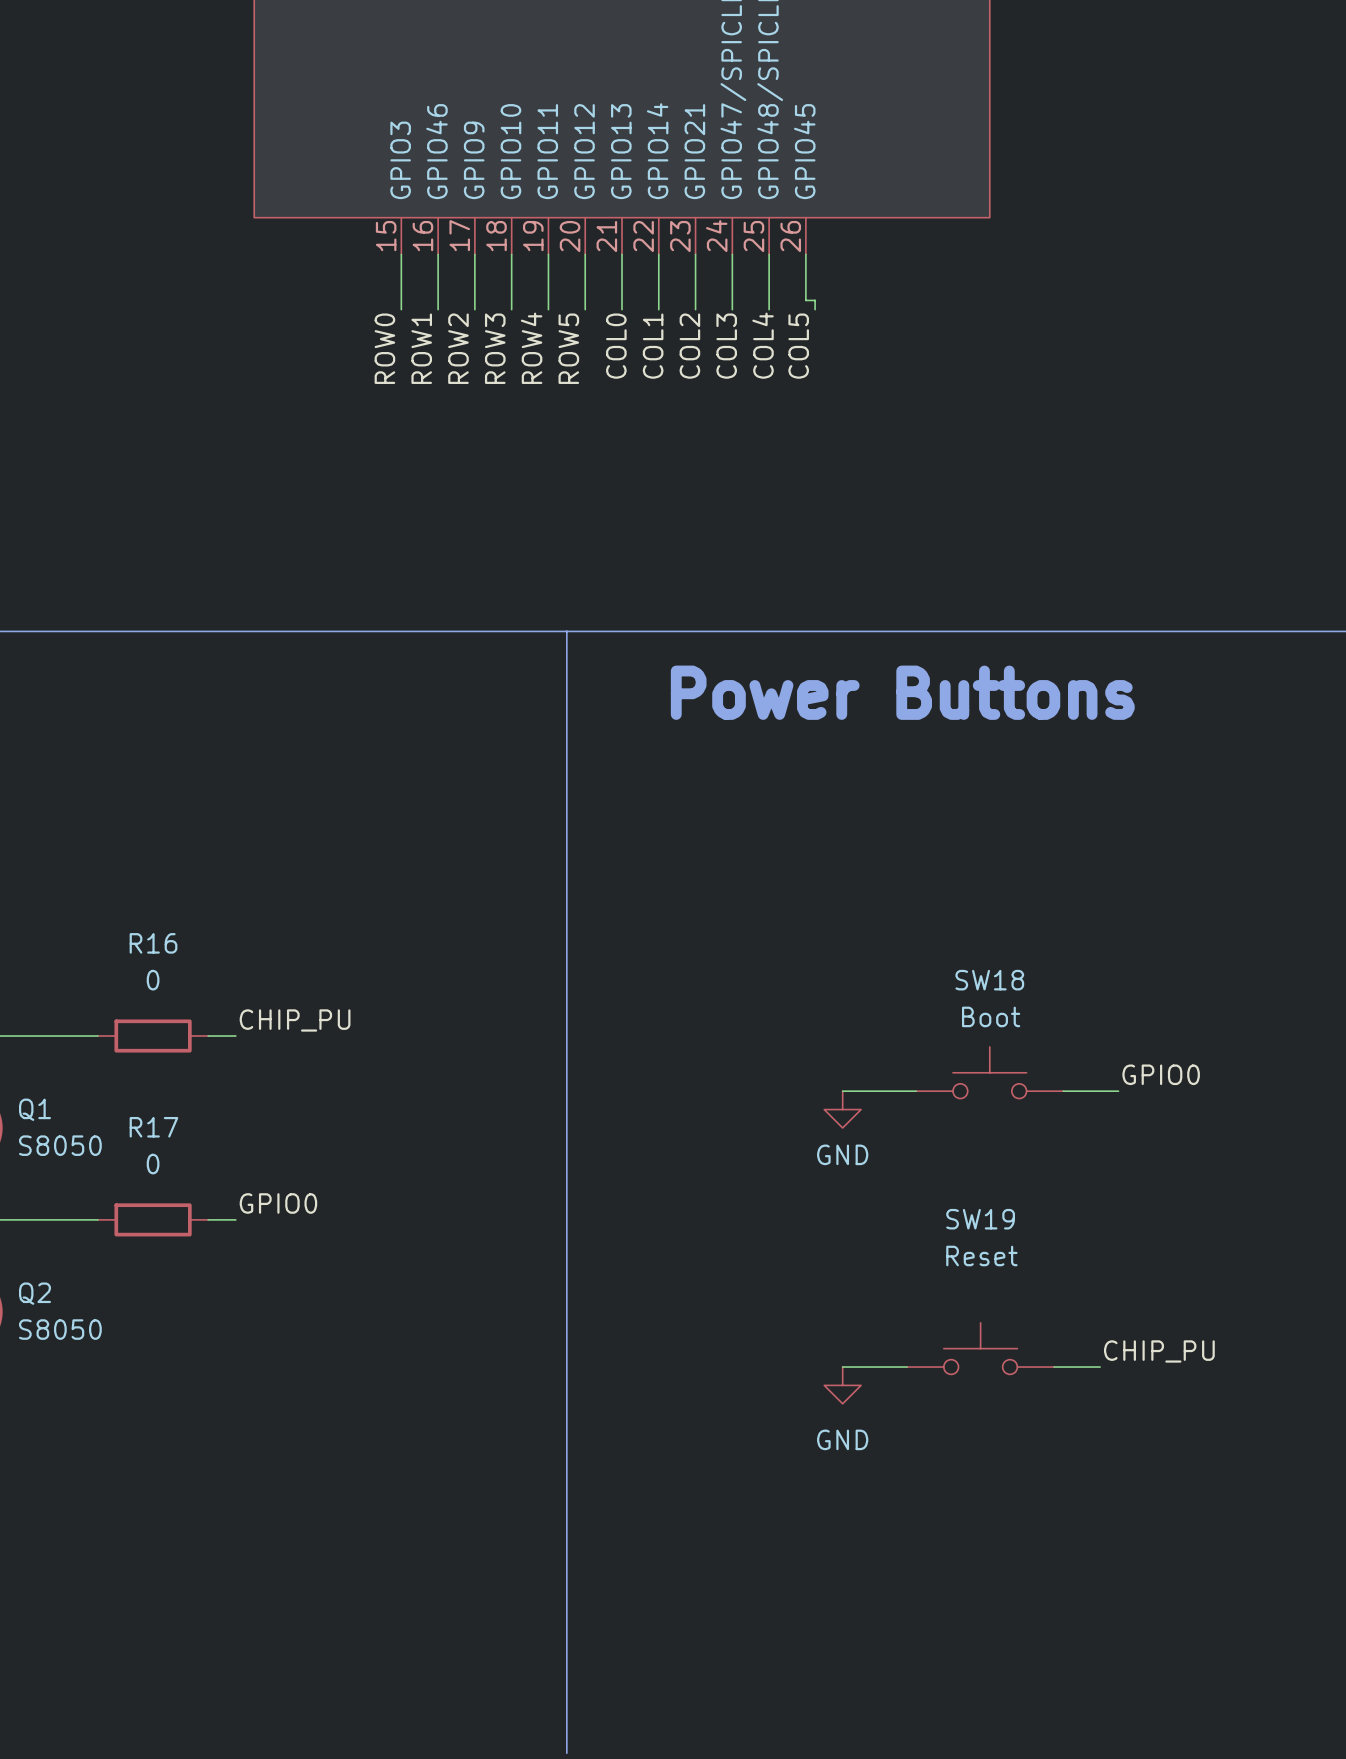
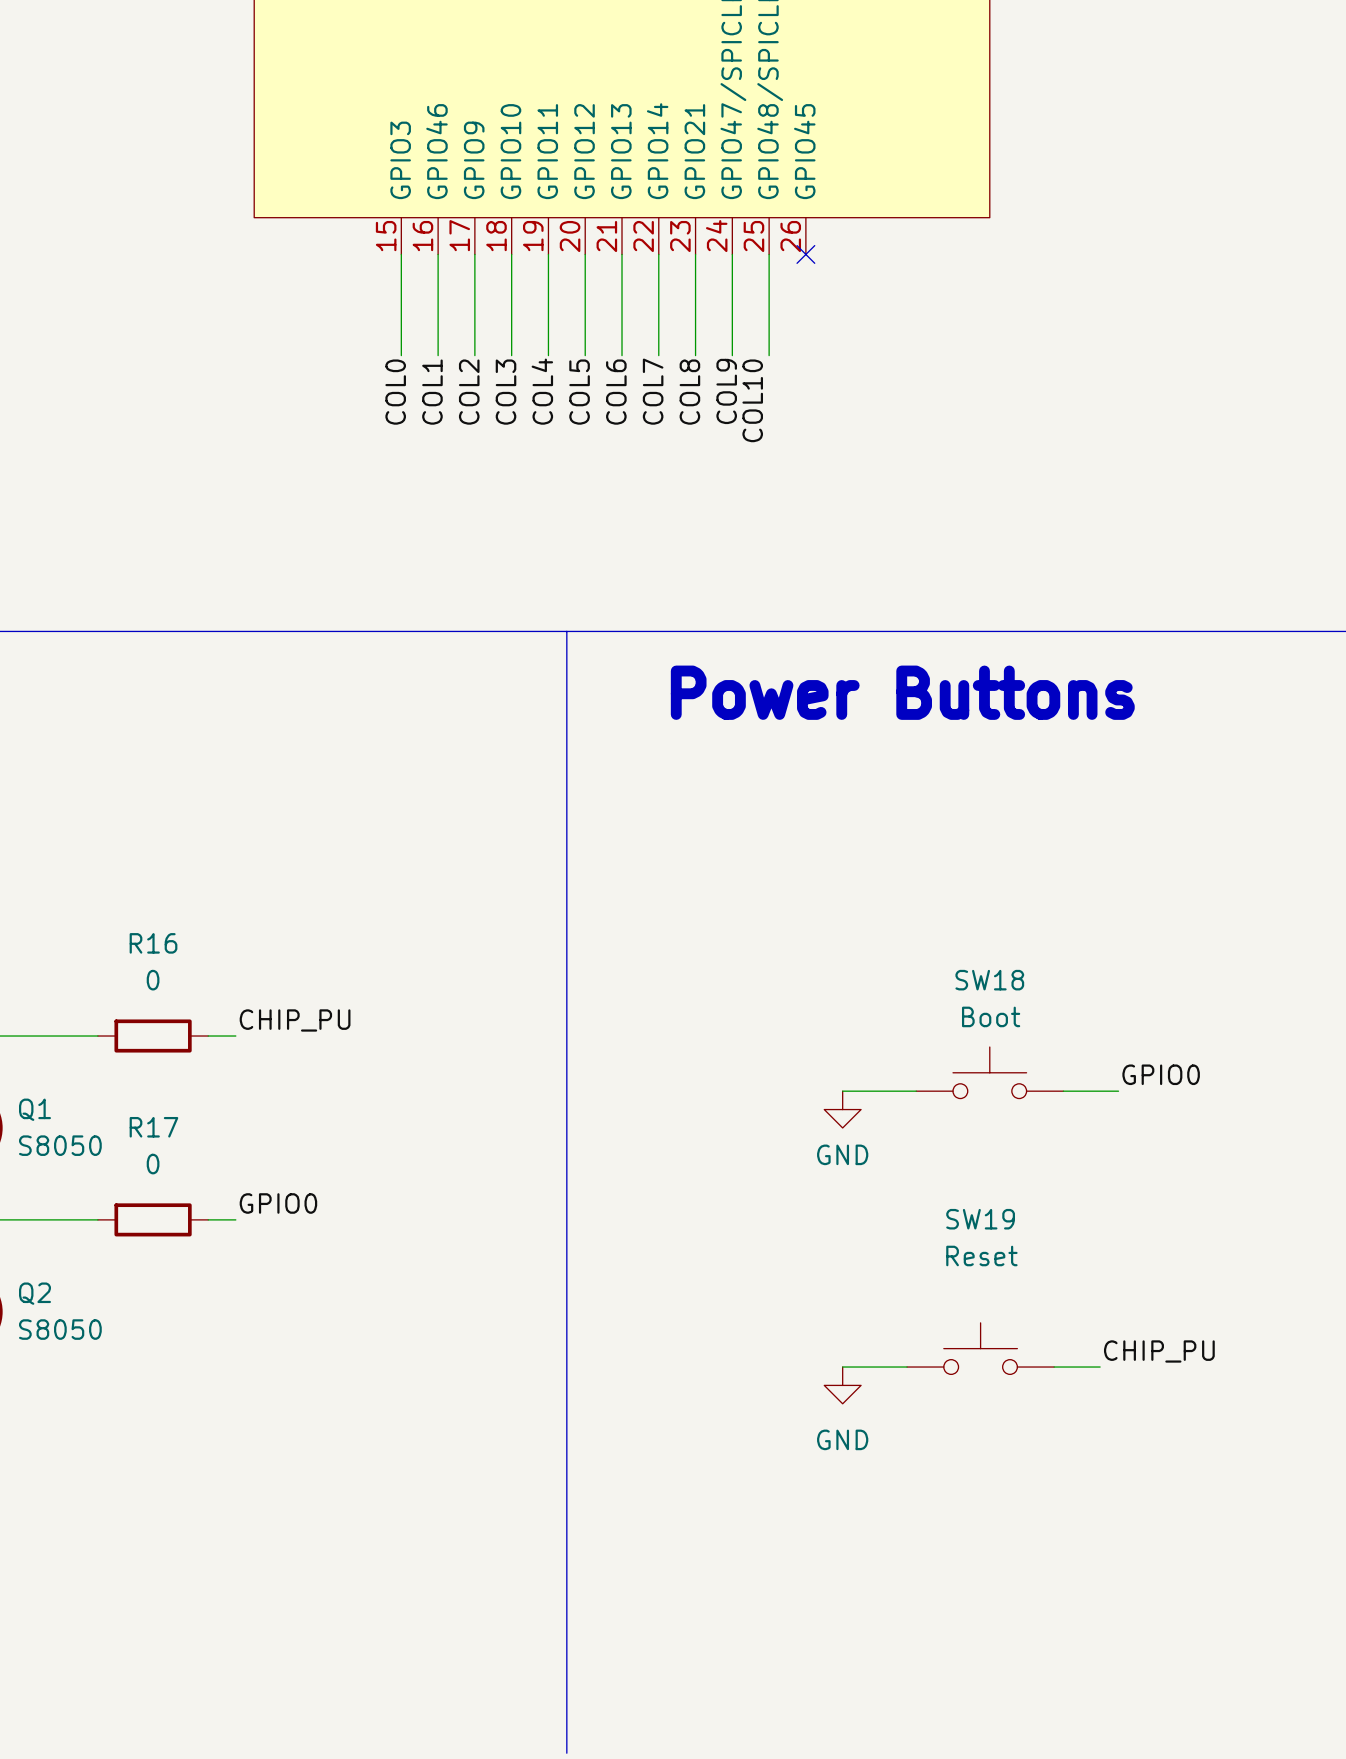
wire: (805, 254) (805, 300) (815, 300) (815, 309) -> none
no-connect mark: none -> (805, 254)
wire: none -> (401, 309) (401, 355)
wire: none -> (438, 309) (438, 355)
wire: none -> (474, 309) (474, 355)
wire: none -> (511, 309) (511, 355)
wire: none -> (548, 309) (548, 355)
wire: none -> (585, 309) (585, 355)
wire: none -> (622, 309) (622, 355)
wire: none -> (658, 309) (658, 355)
wire: none -> (695, 309) (695, 355)
wire: none -> (732, 309) (732, 355)
wire: none -> (769, 309) (769, 355)
label position: COL4 (763, 345) -> COL4 (542, 391)
label position: COL0 (616, 346) -> COL0 (395, 392)
label position: COL1 (653, 346) -> COL1 (432, 392)
label position: COL2 (689, 346) -> COL2 (469, 392)
label position: COL3 (726, 346) -> COL3 (506, 392)
label position: COL5 (798, 346) -> COL5 (579, 392)
label: ROW0 (384, 348) -> none
label: ROW1 (421, 348) -> none
label: ROW2 (458, 348) -> none
label: ROW3 (495, 348) -> none
label: ROW4 (531, 348) -> none
label: ROW5 (568, 348) -> none
label: none -> COL7 (653, 391)
label: none -> COL9 (726, 391)
label: none -> COL6 (616, 392)
label: none -> COL8 (689, 392)
label: none -> COL10 (752, 400)

